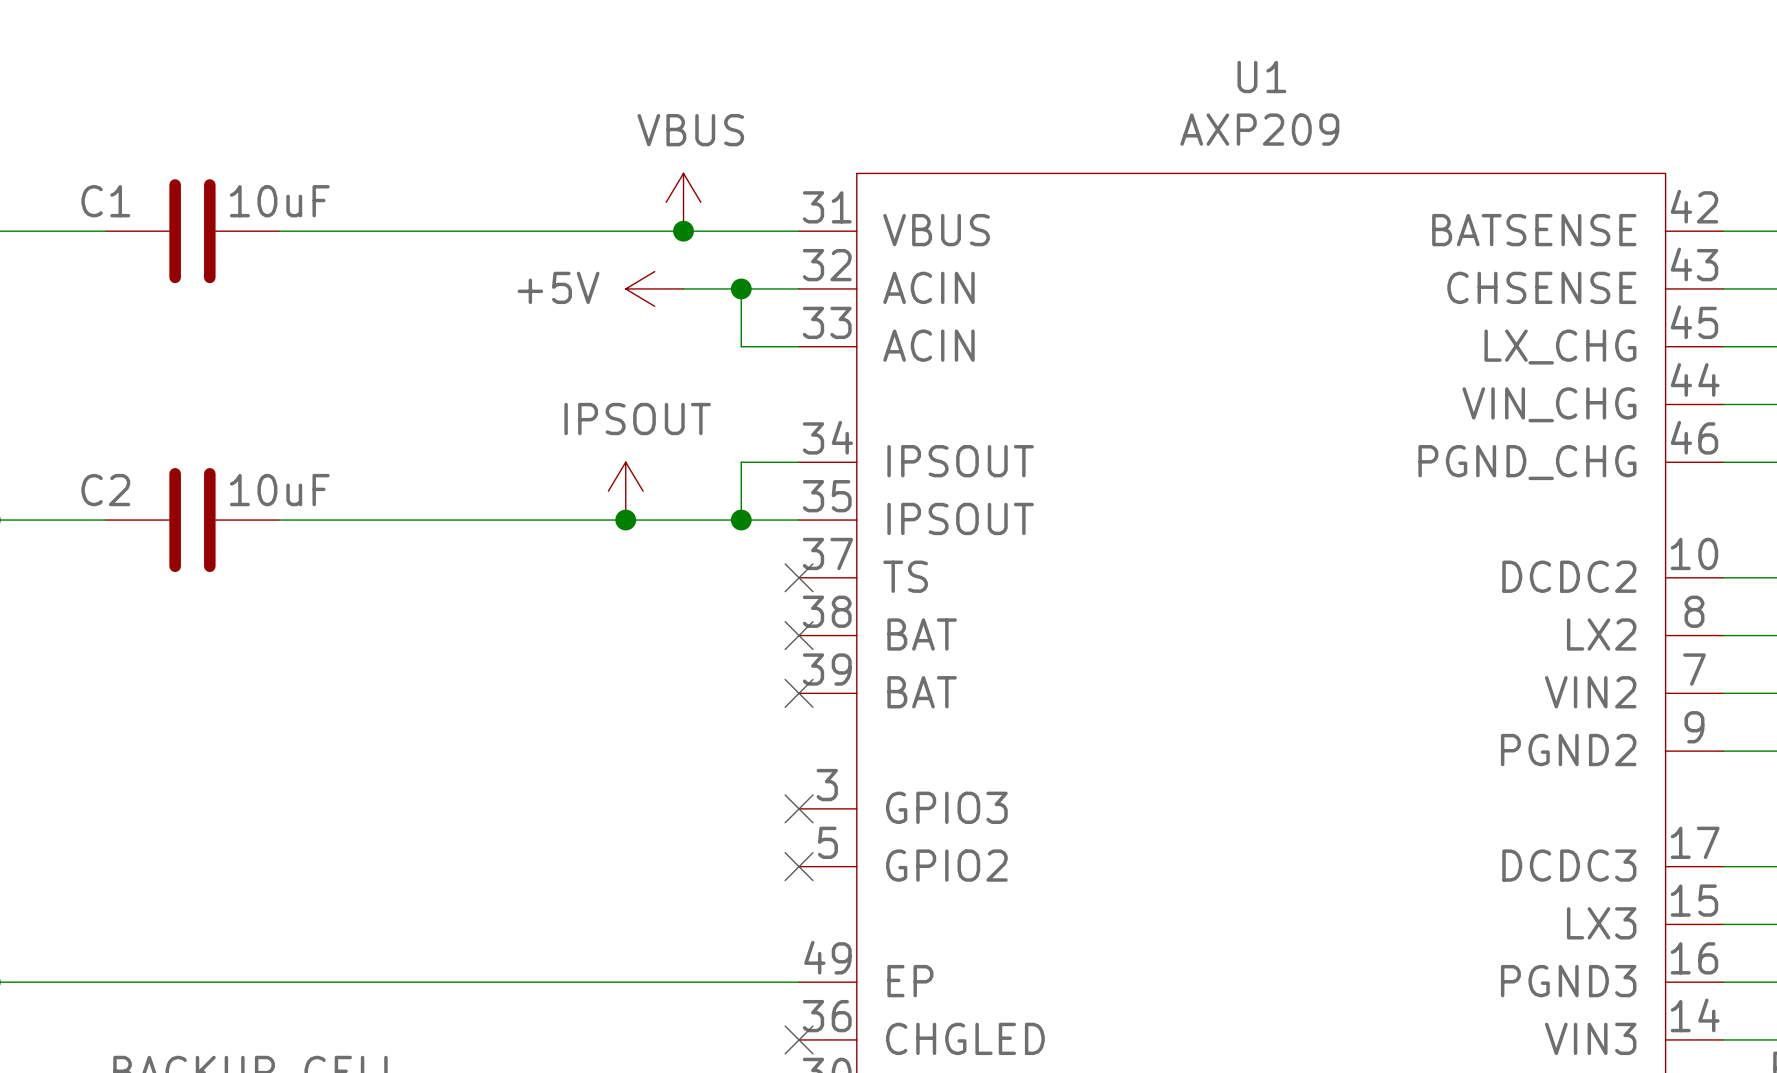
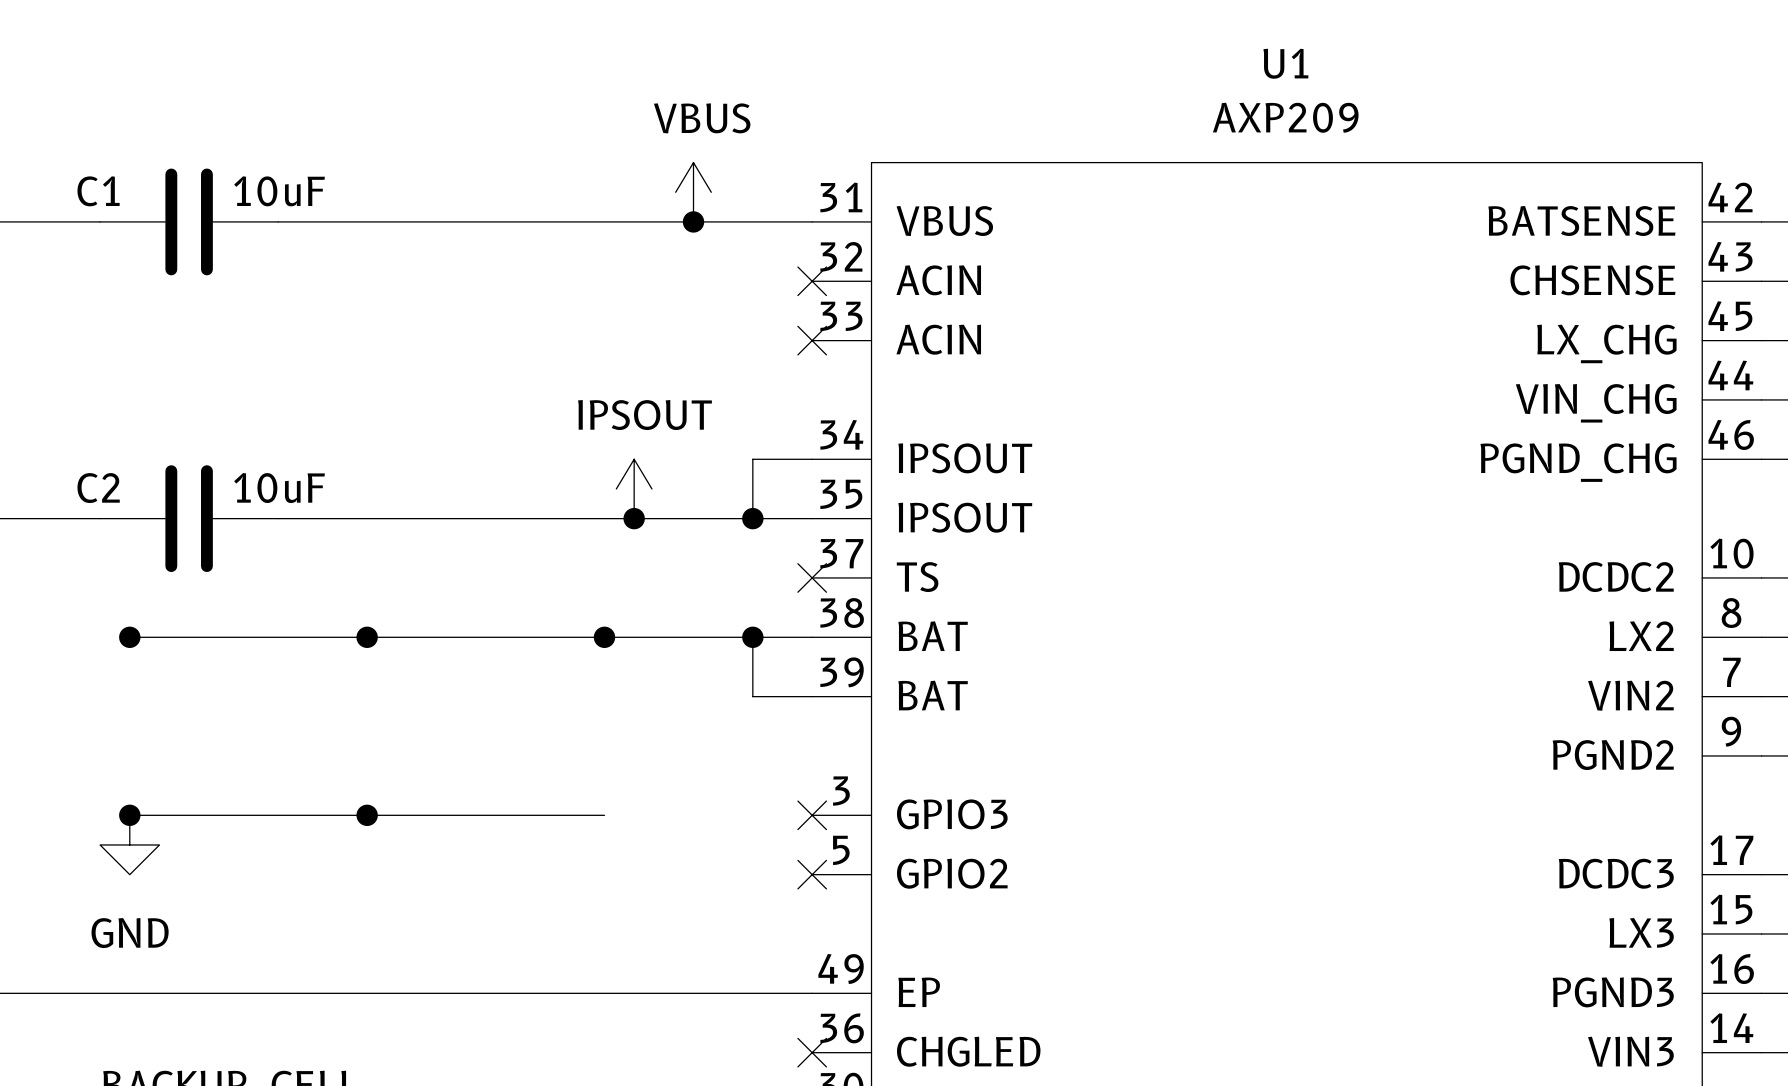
power symbol: +5V (654, 288) -> none
wire: (683, 288) (799, 288) -> none
wire: (741, 288) (741, 346) (799, 346) -> (752, 637) (752, 696) (812, 696)
junction: (741, 288) -> none
no-connect mark: none -> (812, 281)
no-connect mark: none -> (812, 340)
wire: none -> (129, 637) (812, 637)
junction: none -> (129, 637)
junction: none -> (367, 637)
junction: none -> (604, 637)
junction: none -> (752, 637)
no-connect mark: (799, 635) -> none
no-connect mark: (799, 693) -> none
wire: none -> (129, 815) (604, 815)
junction: none -> (129, 815)
junction: none -> (367, 815)
power symbol: none -> GND (129, 844)

